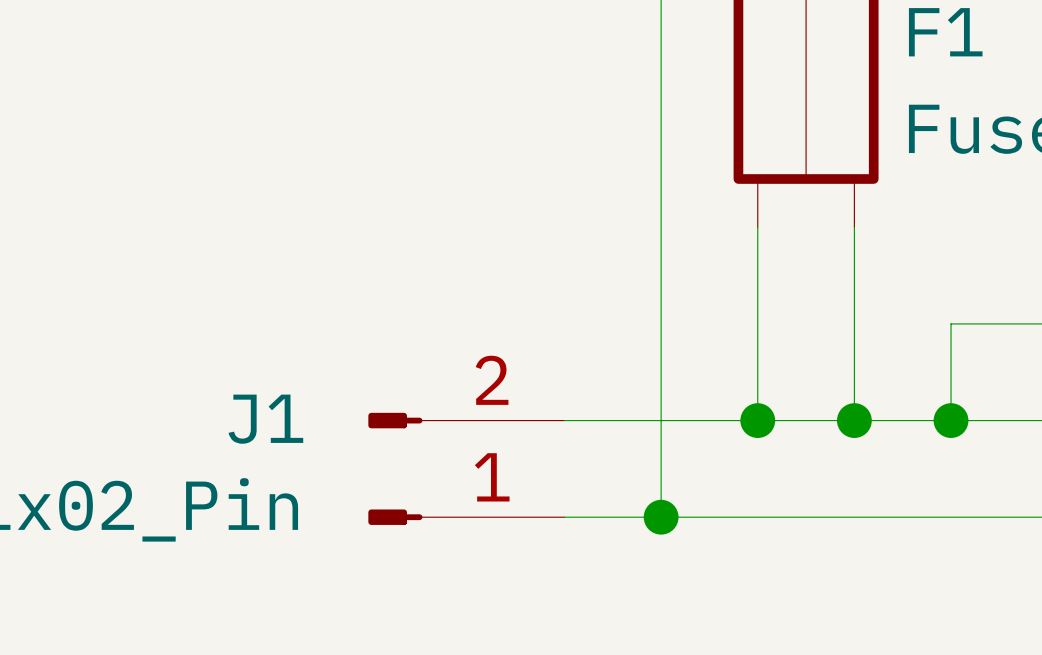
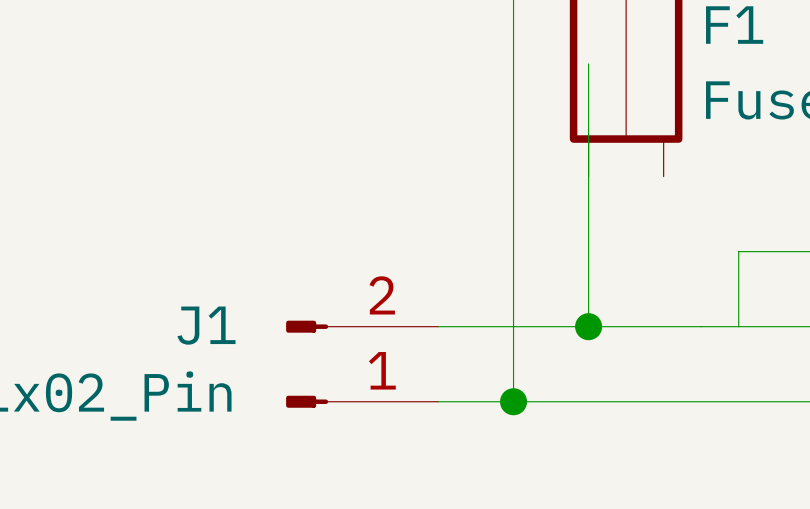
wire: none -> (588, 63) (588, 176)
wire: (854, 227) (854, 420) -> none
junction: (854, 420) -> none
junction: (951, 420) -> none

